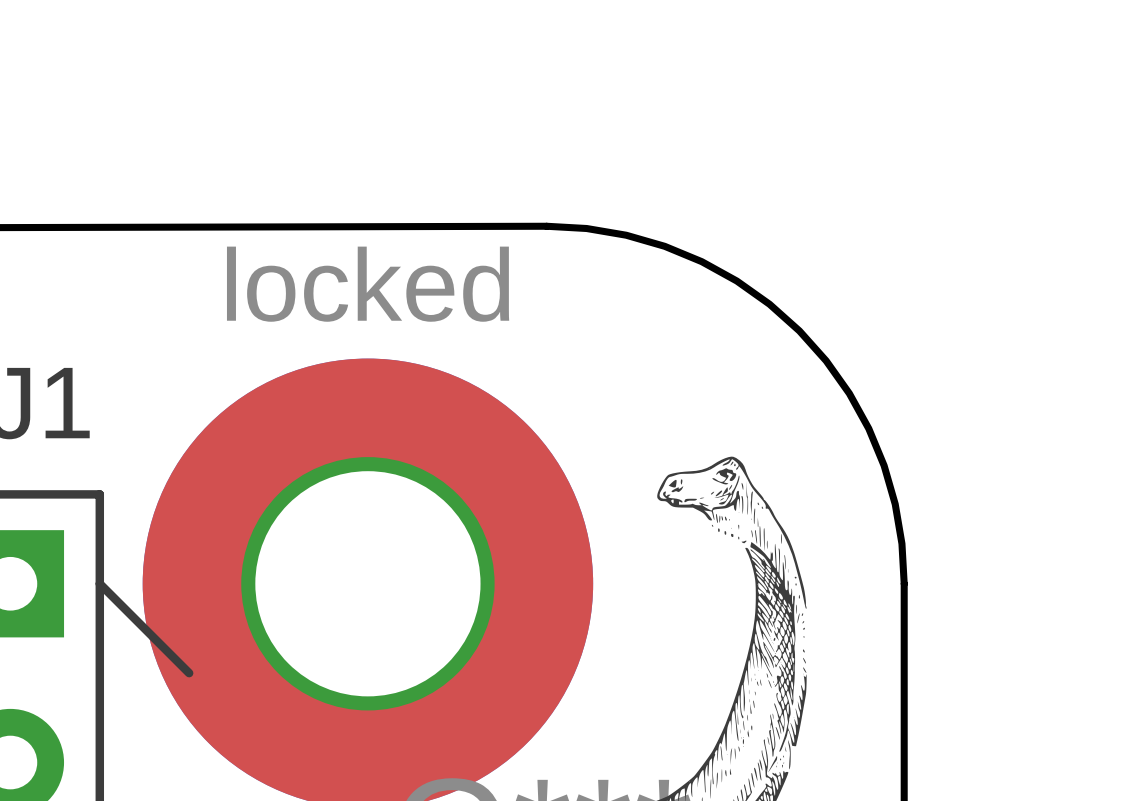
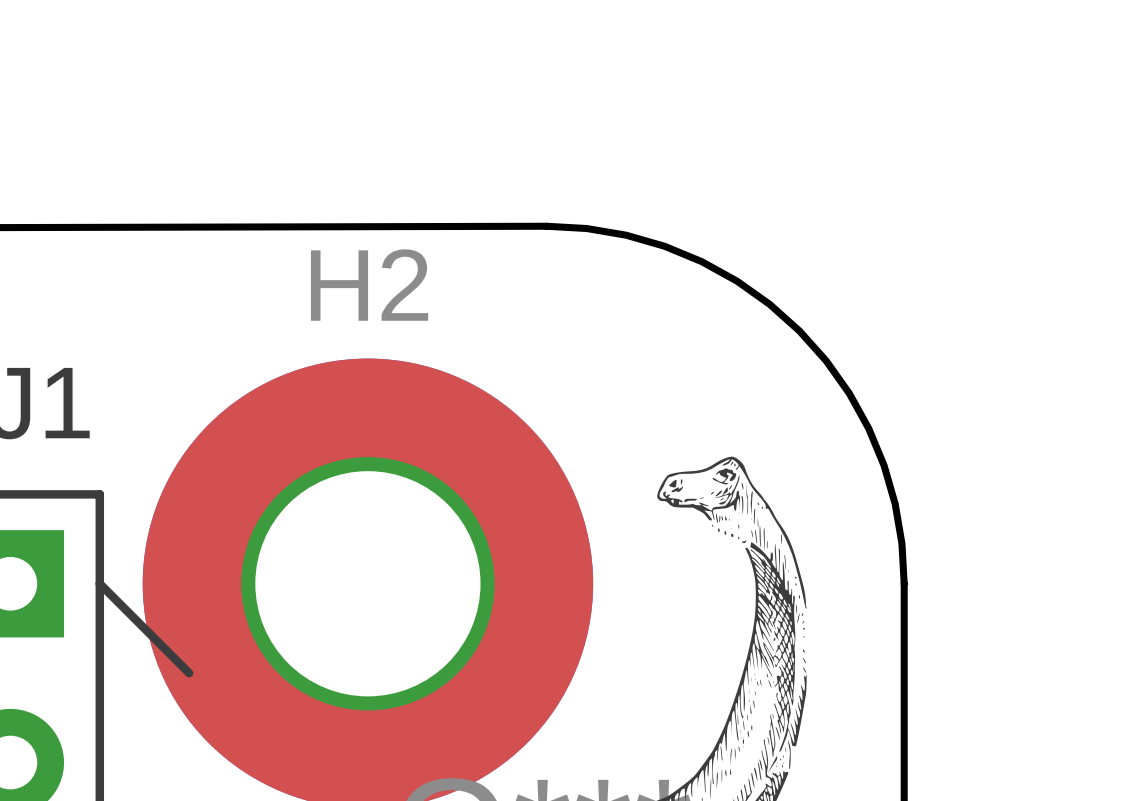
locked name: locked (368, 284) -> H2 (369, 285)

